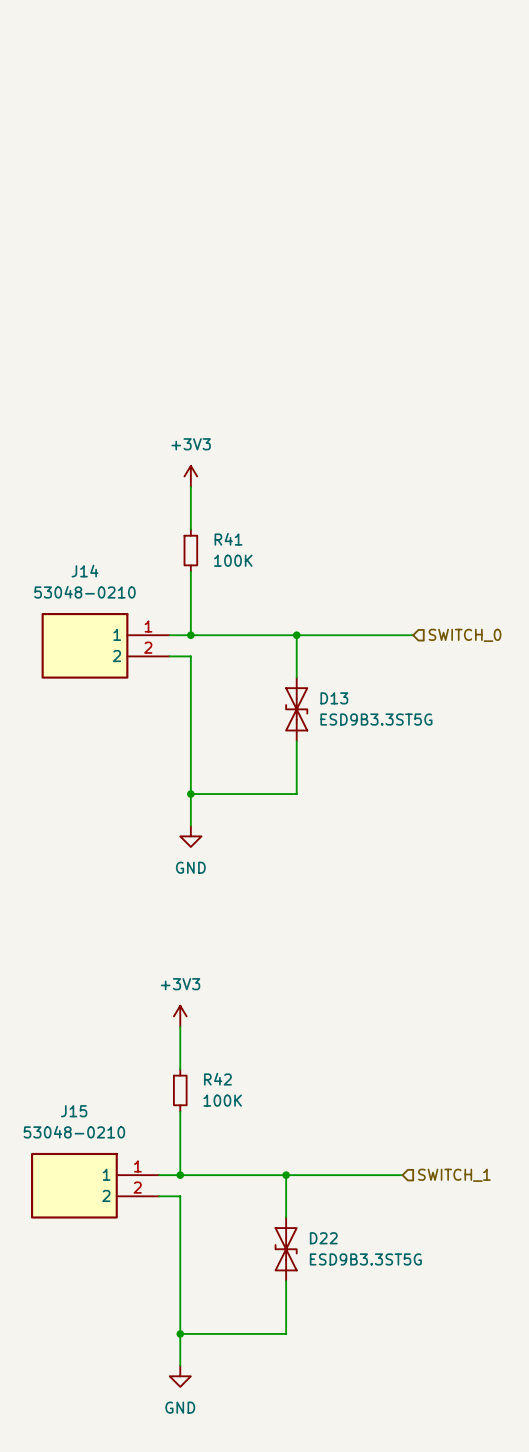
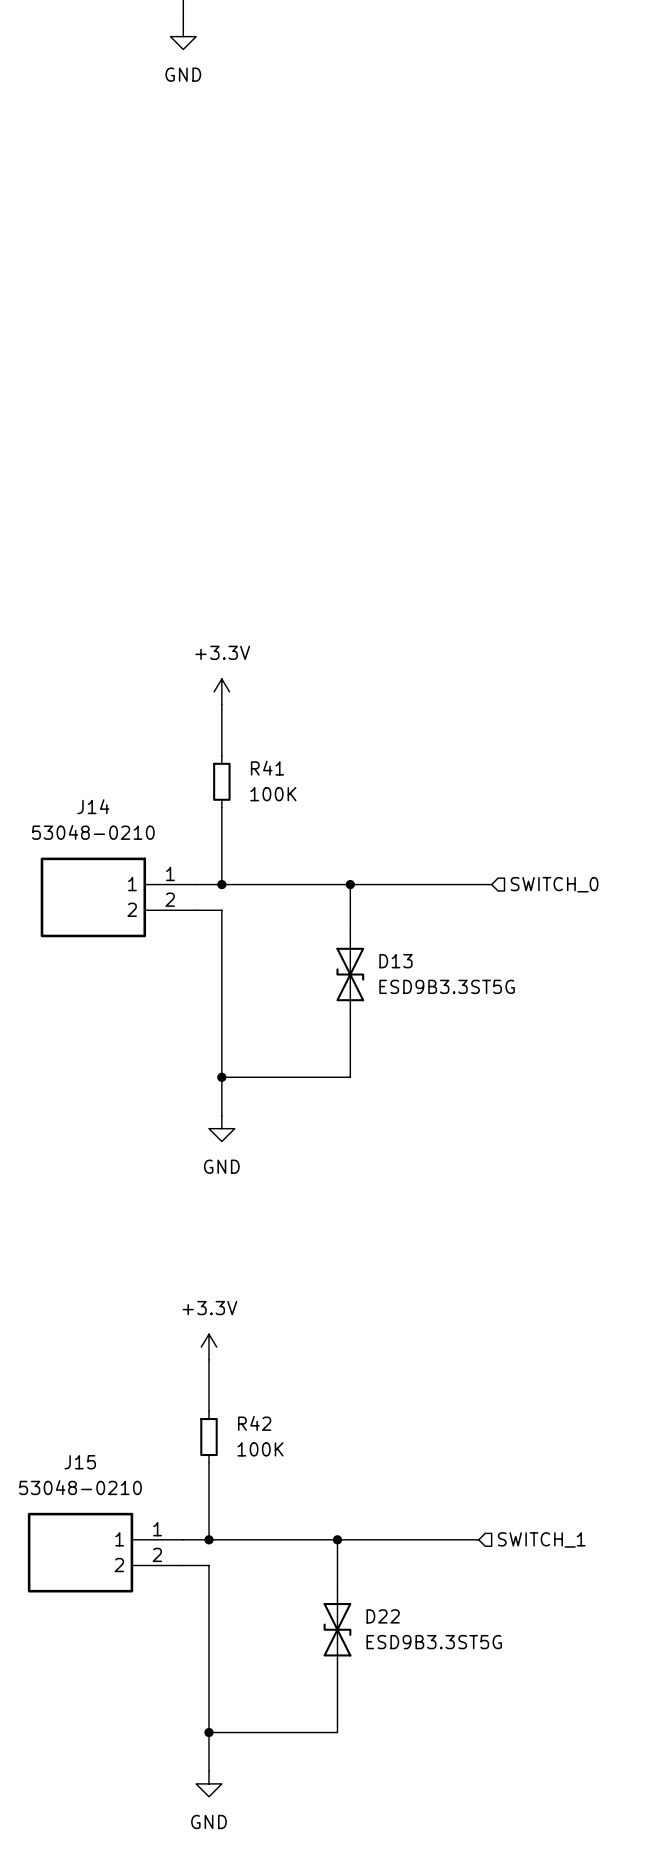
power symbol: +3V3 (190, 476) -> +3.3V (221, 691)
power symbol: +3V3 (180, 1016) -> +3.3V (209, 1347)

